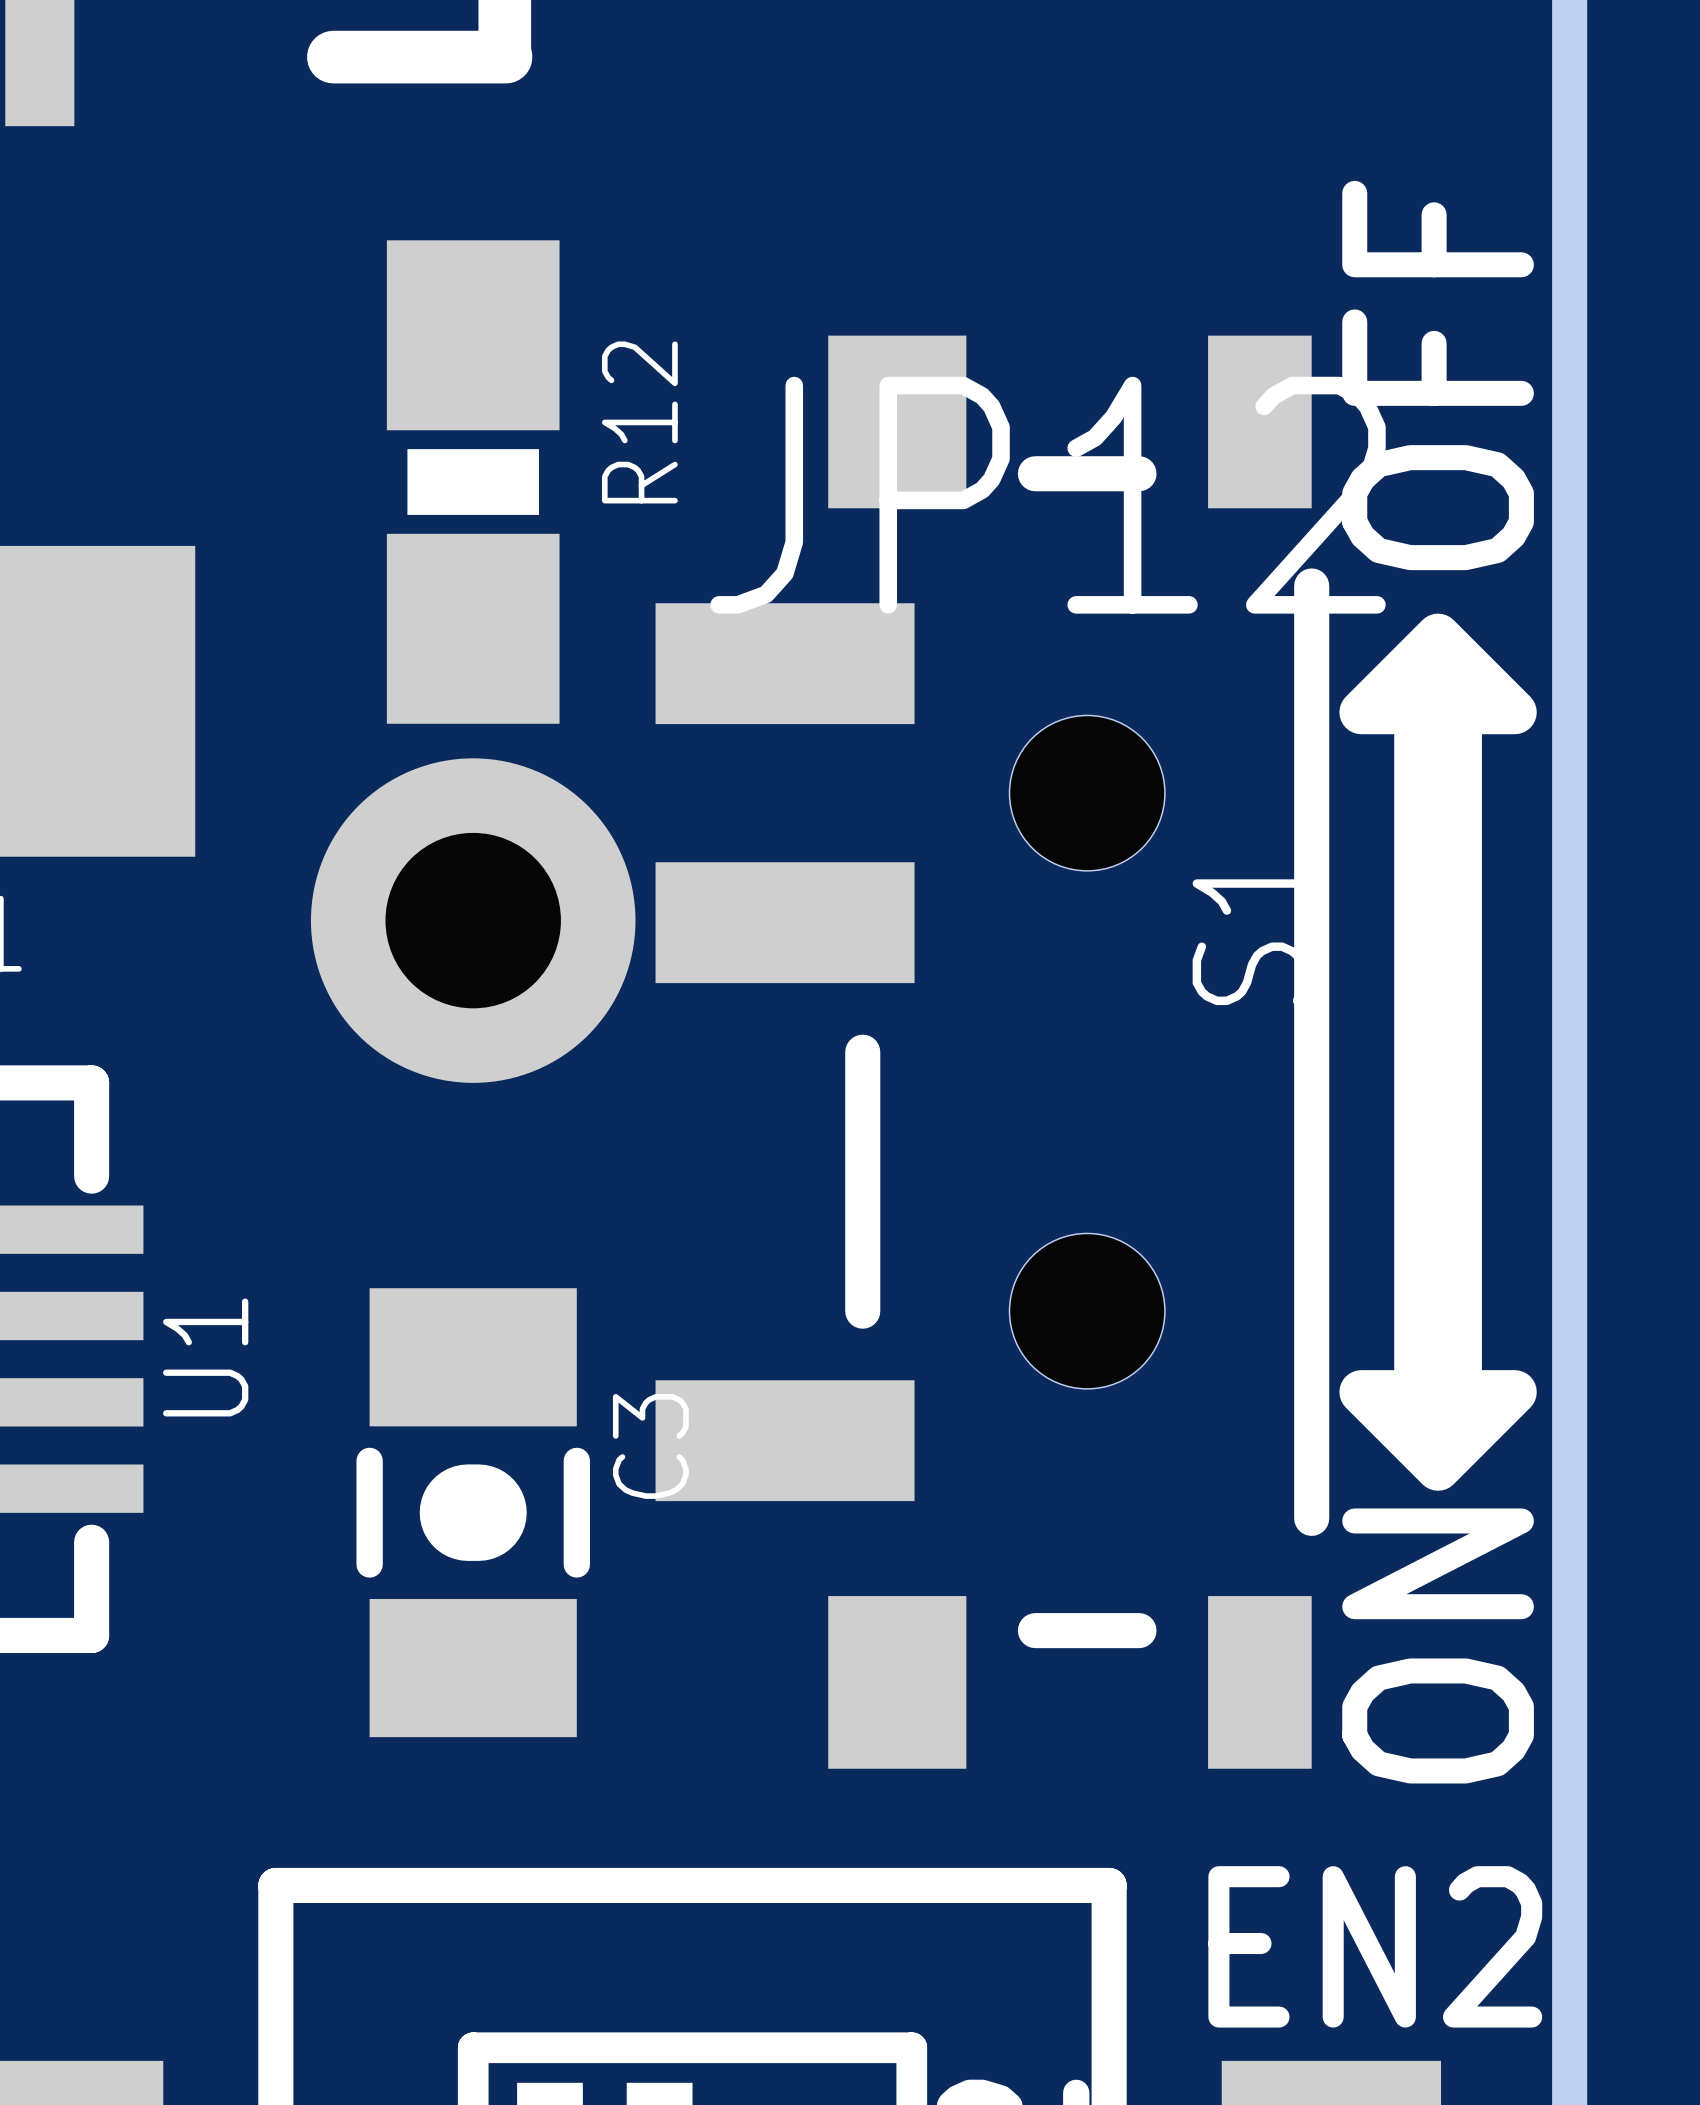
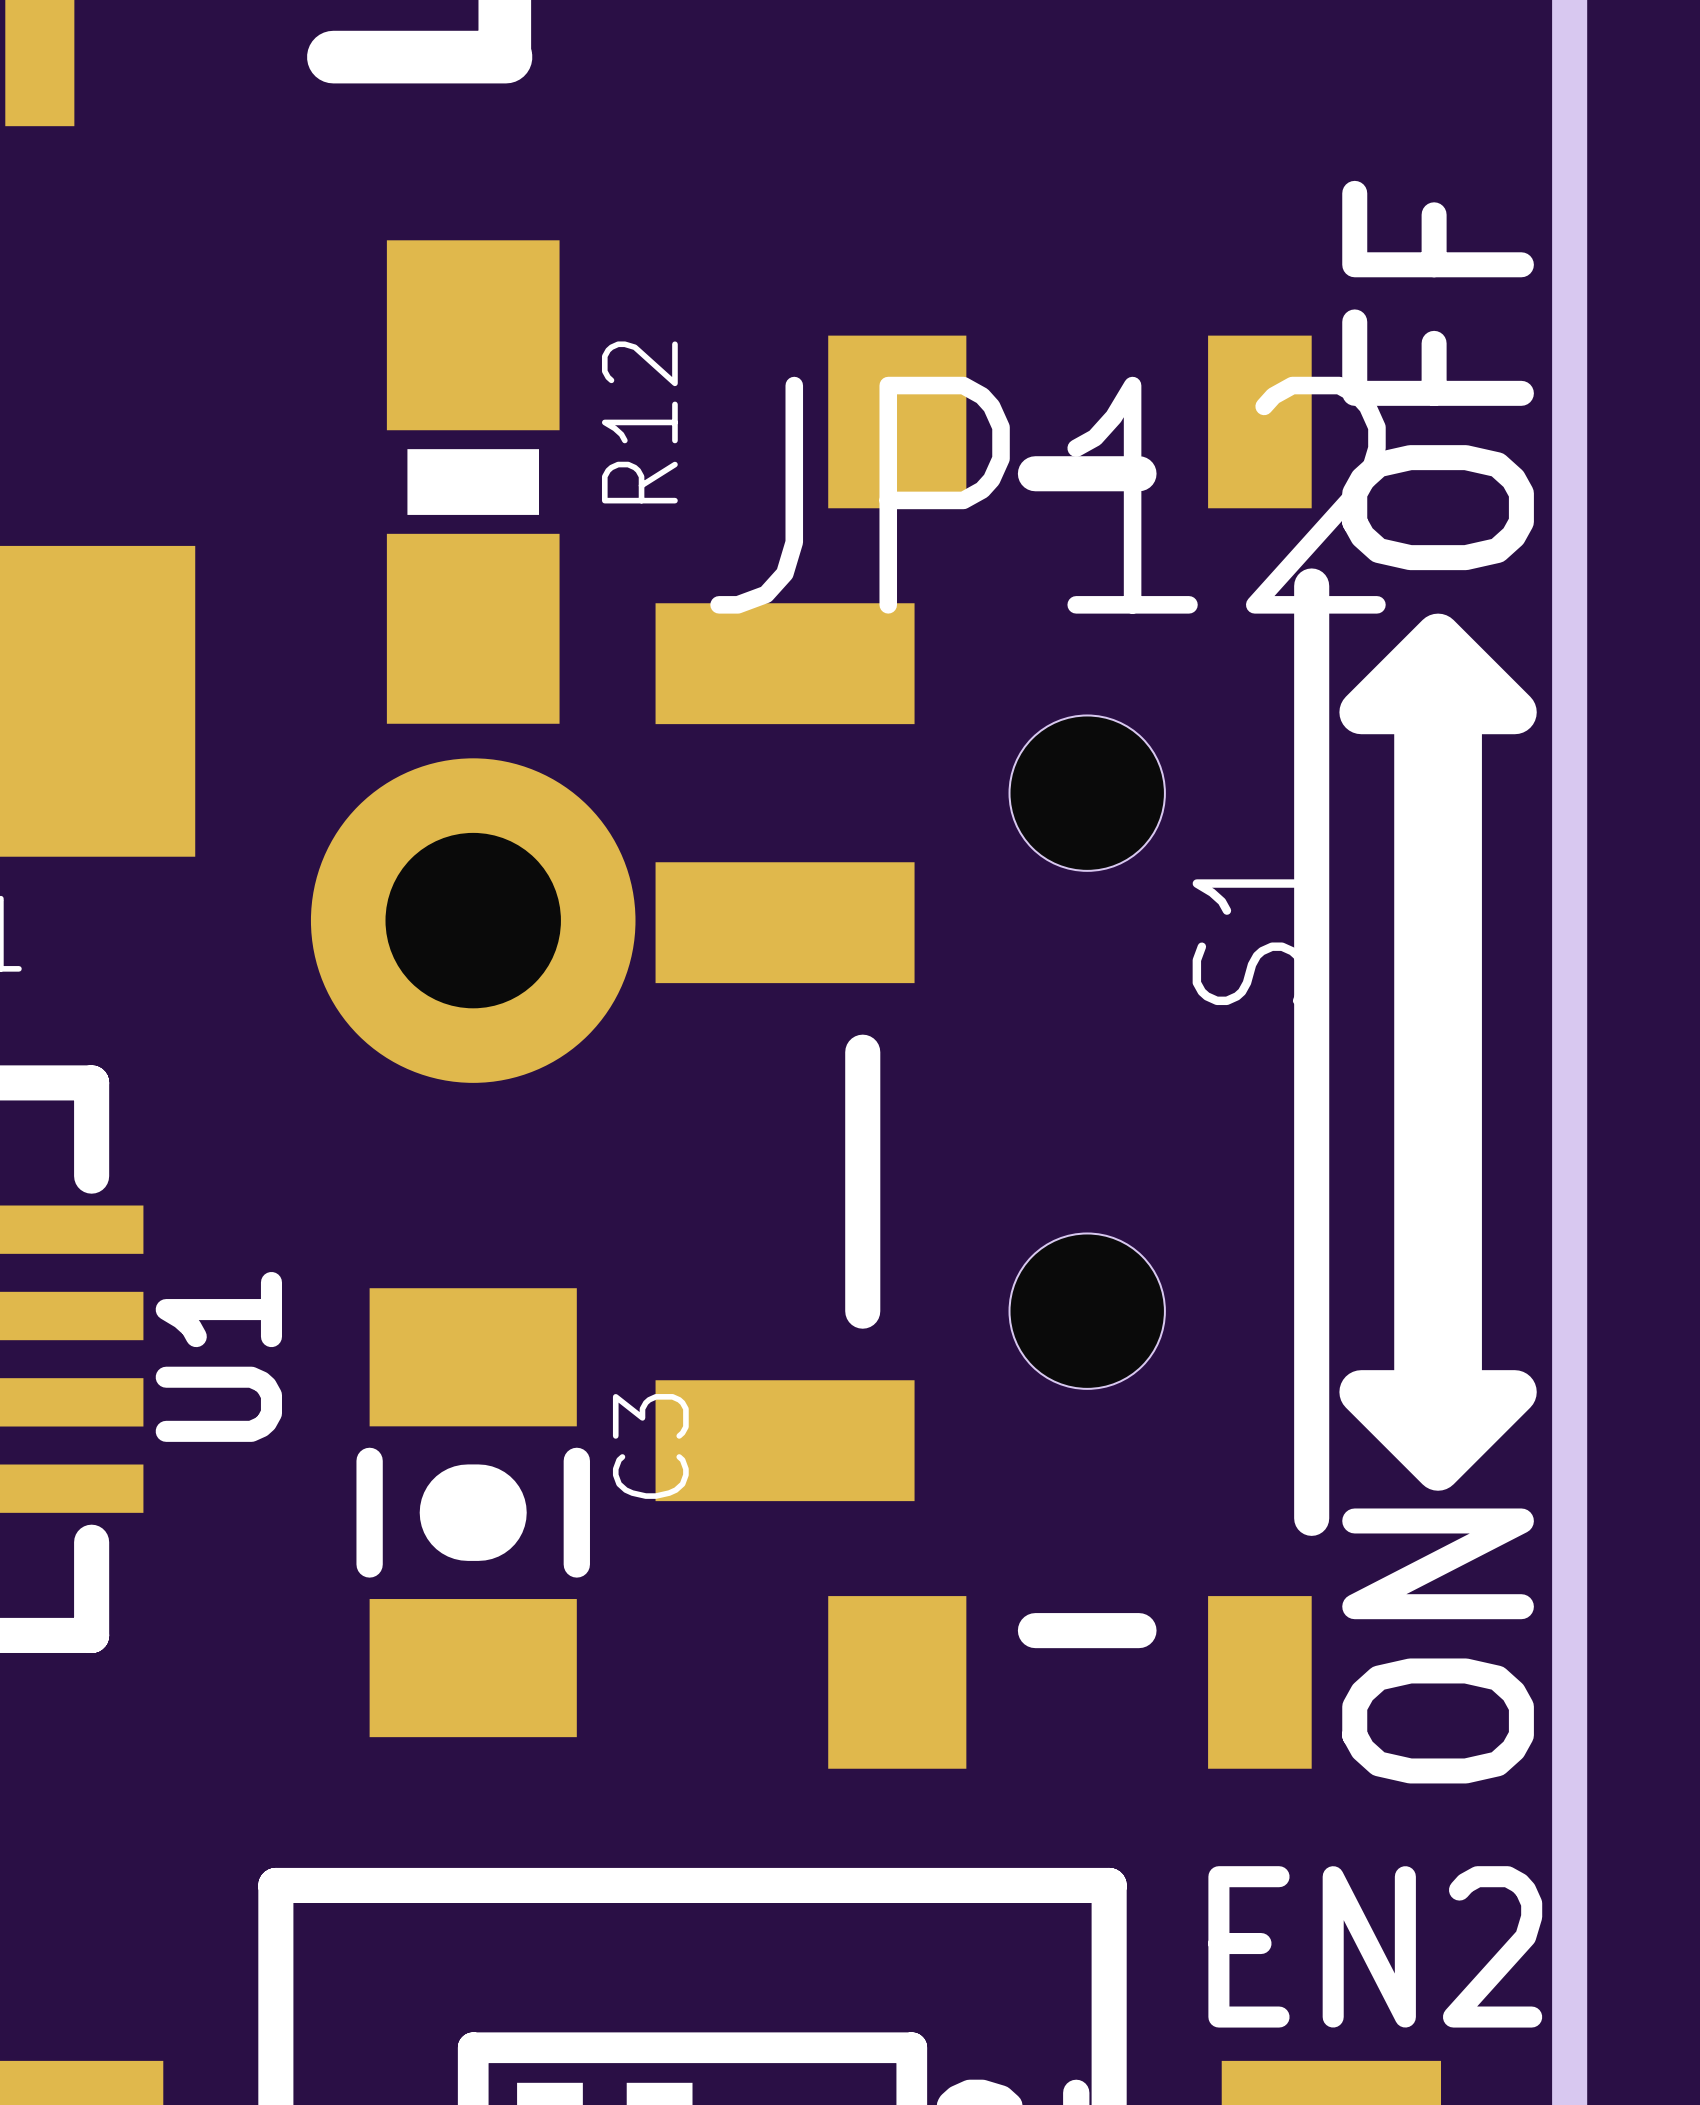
U1 name position: U1 (205, 1357) -> U1 (218, 1356)

